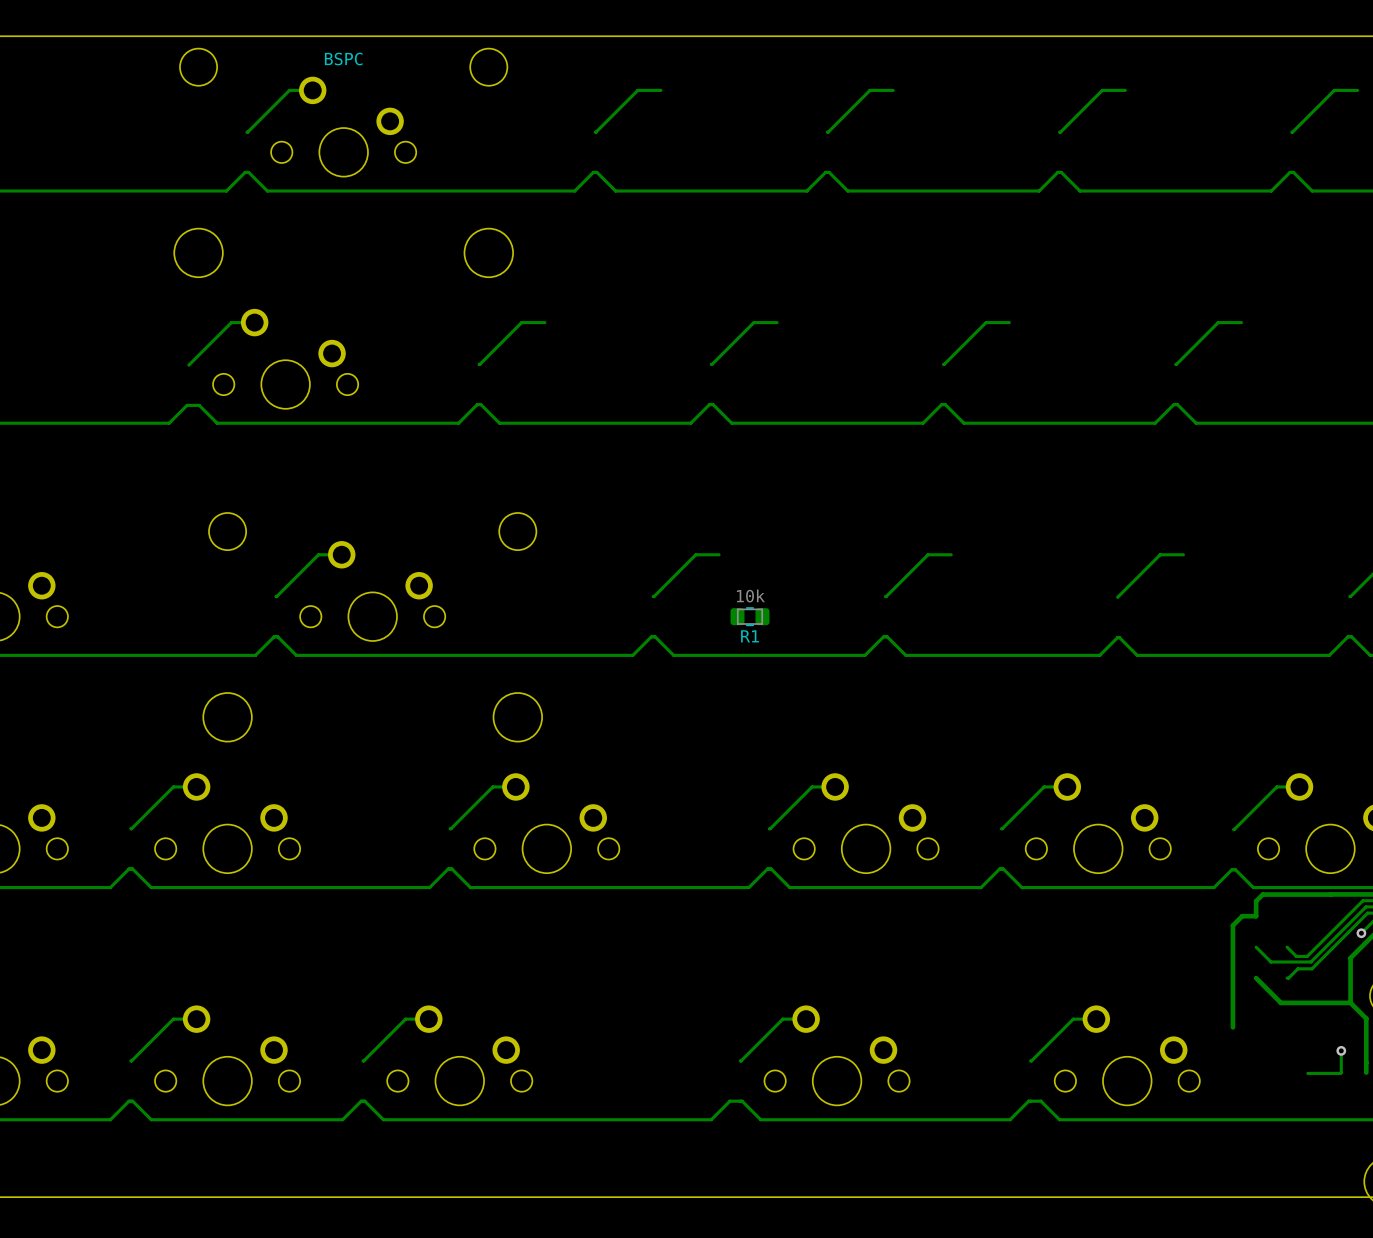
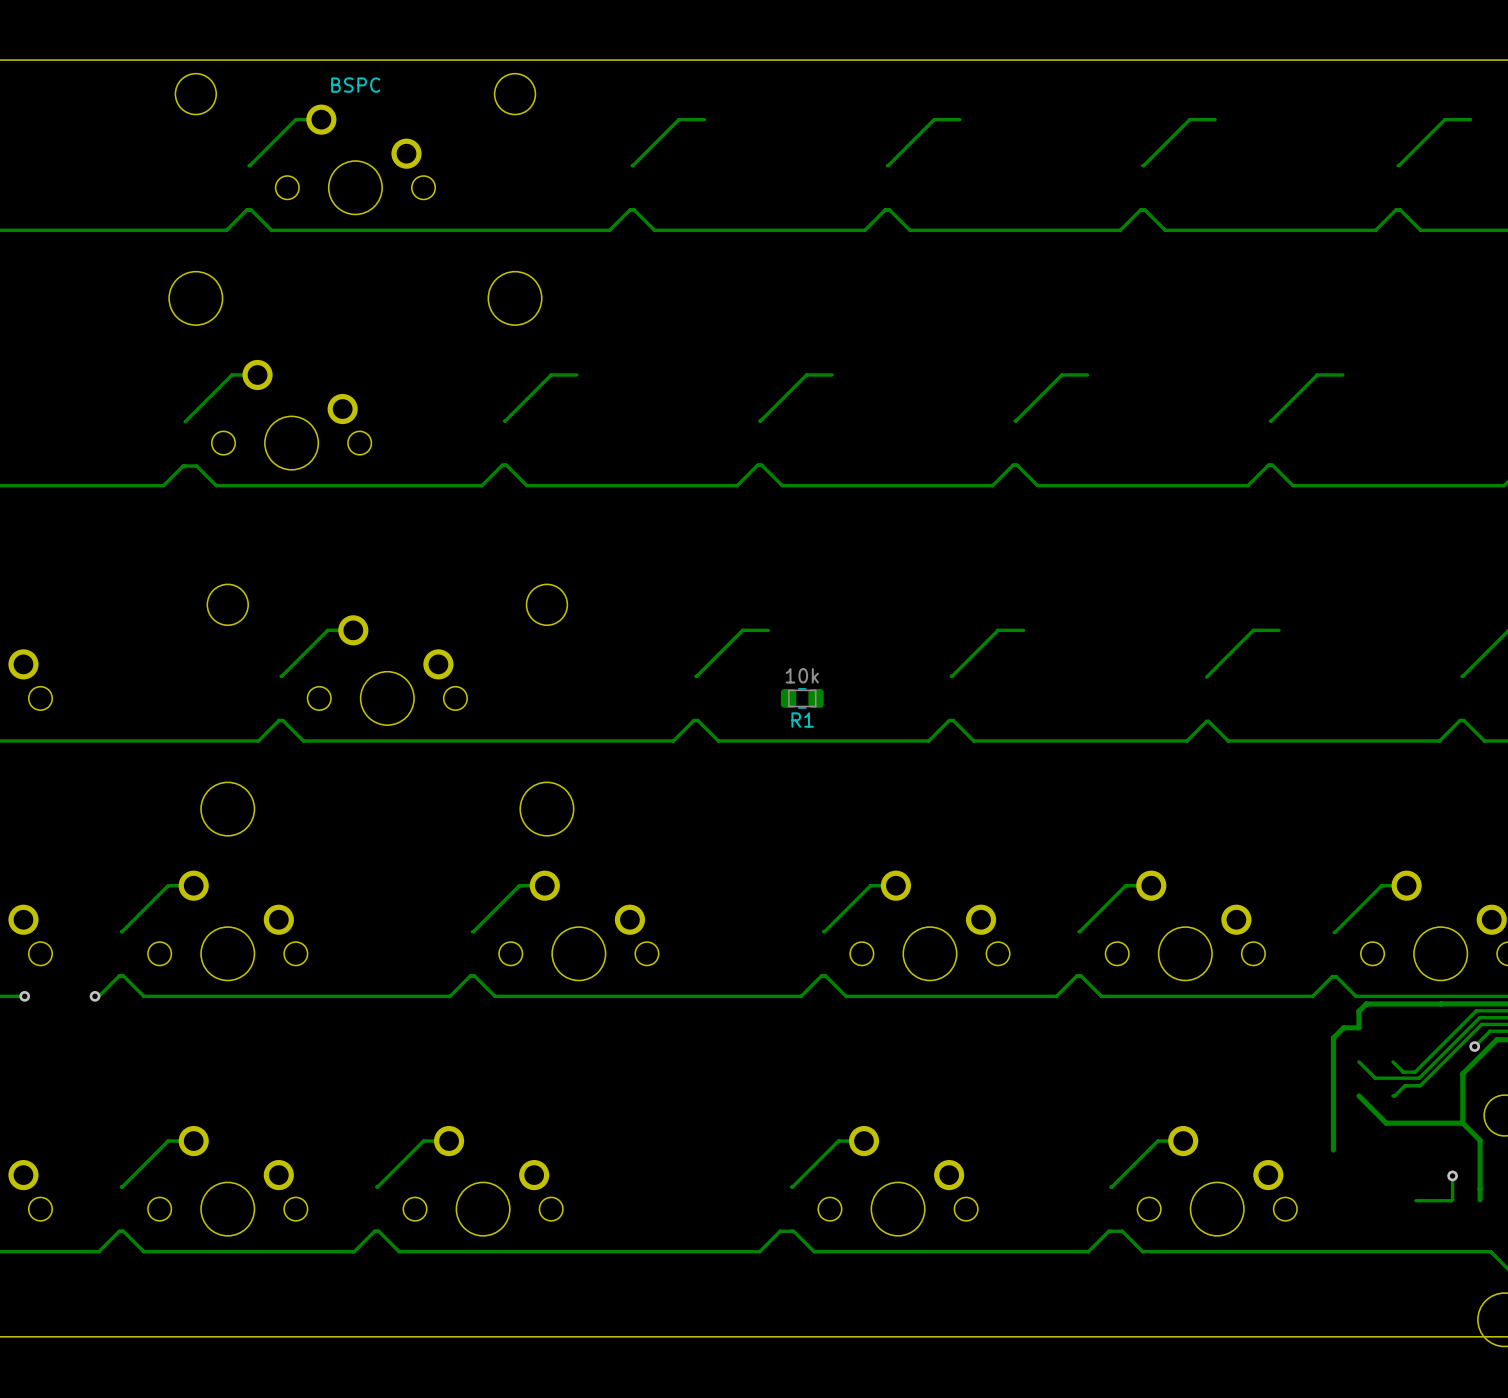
via: none -> (24, 996)
track: (106, 887) (42, 887) -> none
via: none -> (95, 996)

